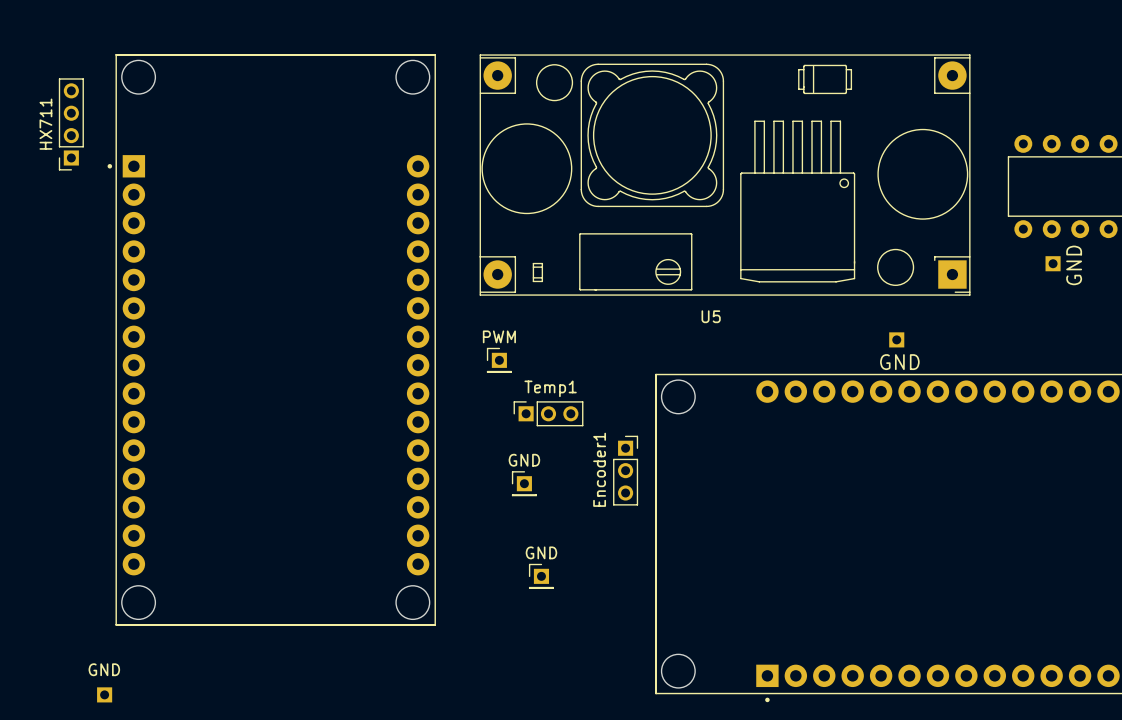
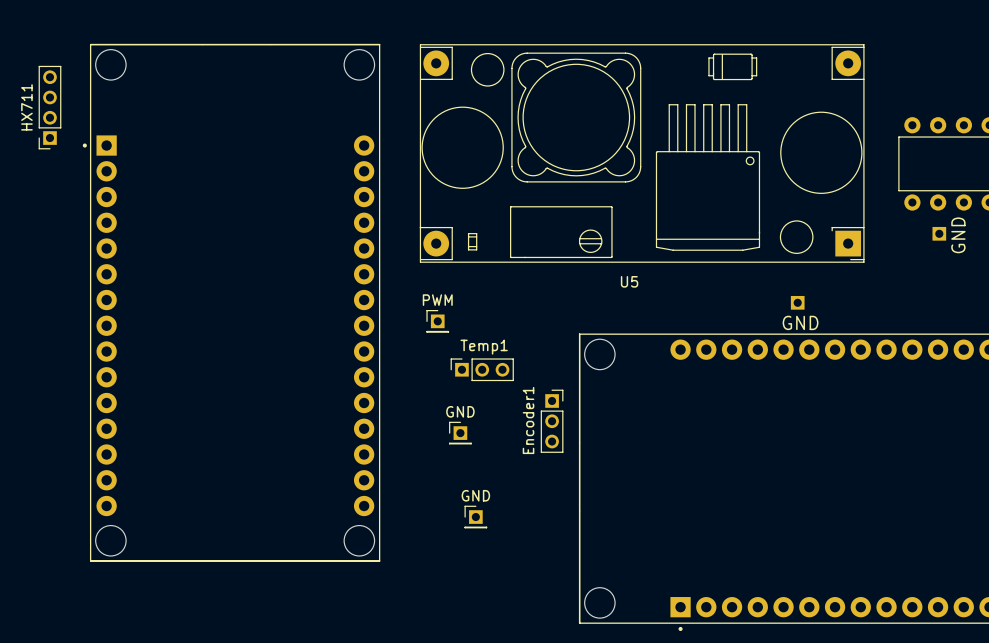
text: GND (104, 669) -> none
part: (104, 694) -> none

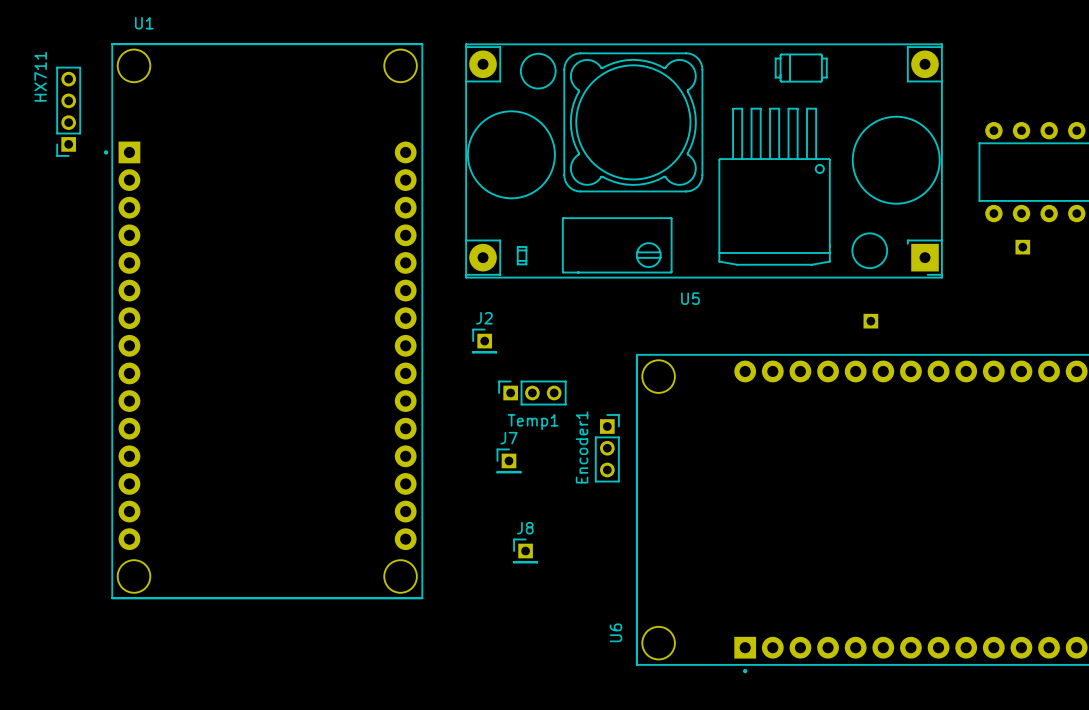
U1 name: none -> U1 (144, 23)
HX711 name position: HX711 (26, 107) -> HX711 (40, 76)
GND name: GND (958, 235) -> none
PWM name: PWM (437, 300) -> J2 (484, 318)
GND name: GND (800, 322) -> none
Temp1 name position: Temp1 (484, 347) -> Temp1 (533, 422)
GND name: GND (460, 411) -> J7 (508, 438)
GND name: GND (475, 495) -> J8 (525, 528)
U6 name: none -> U6 (615, 632)

